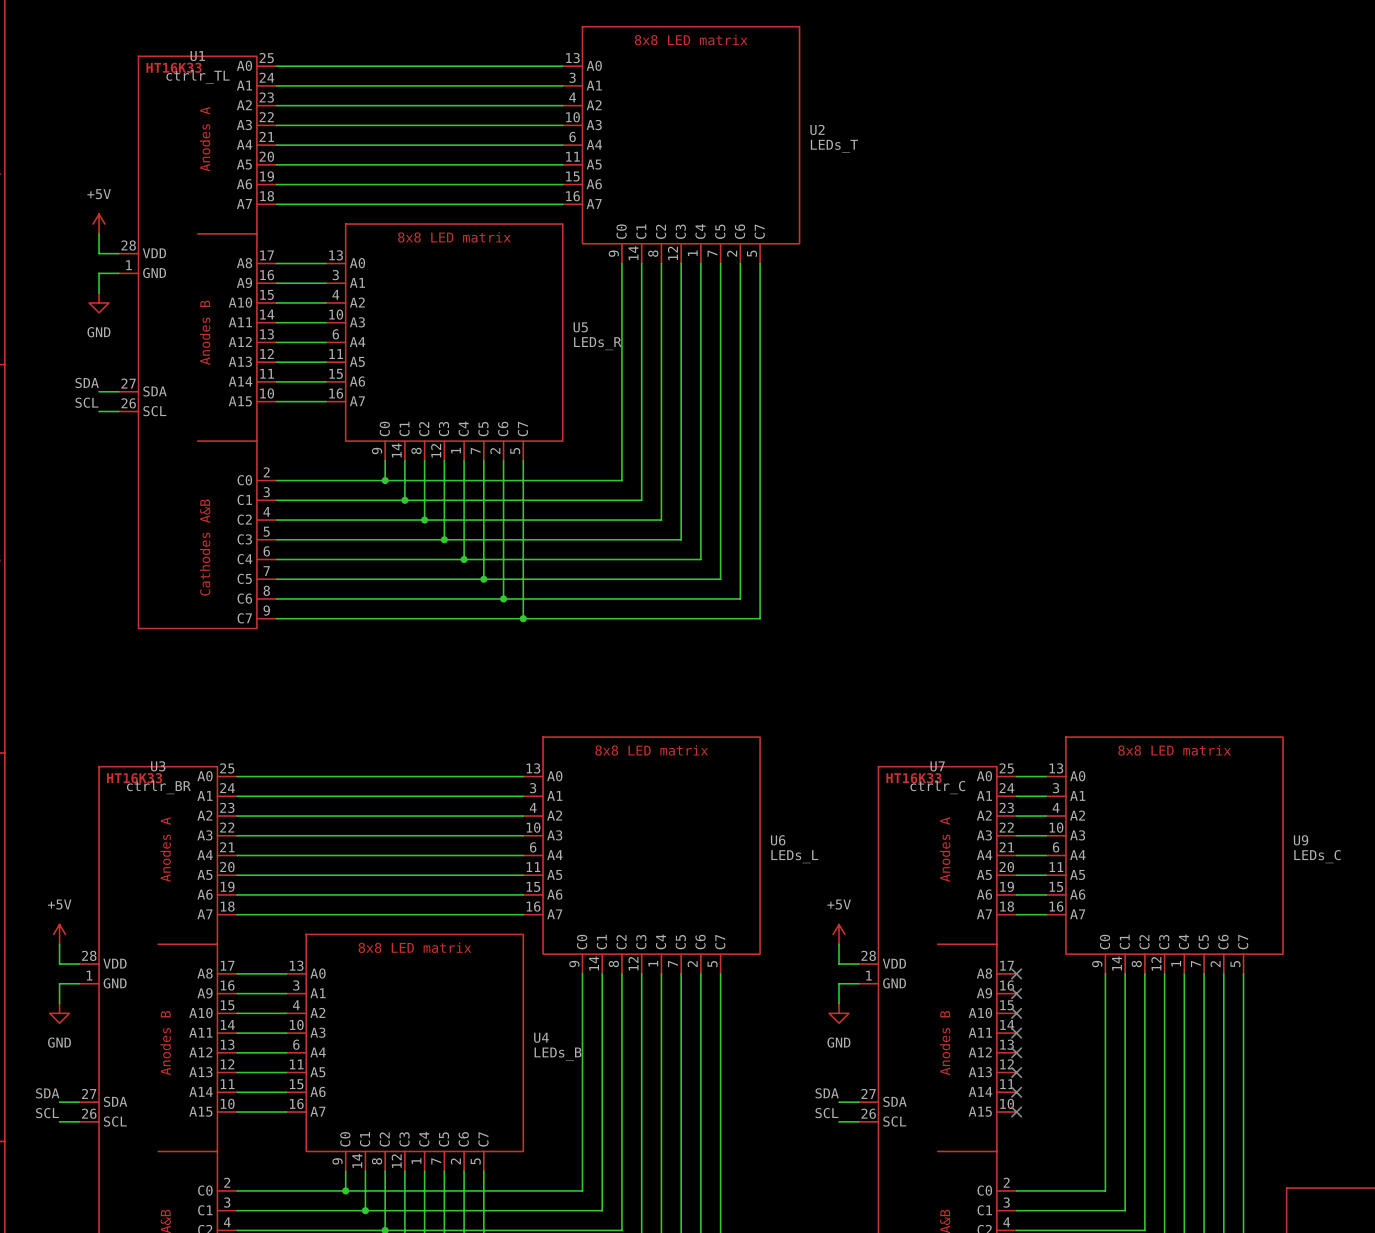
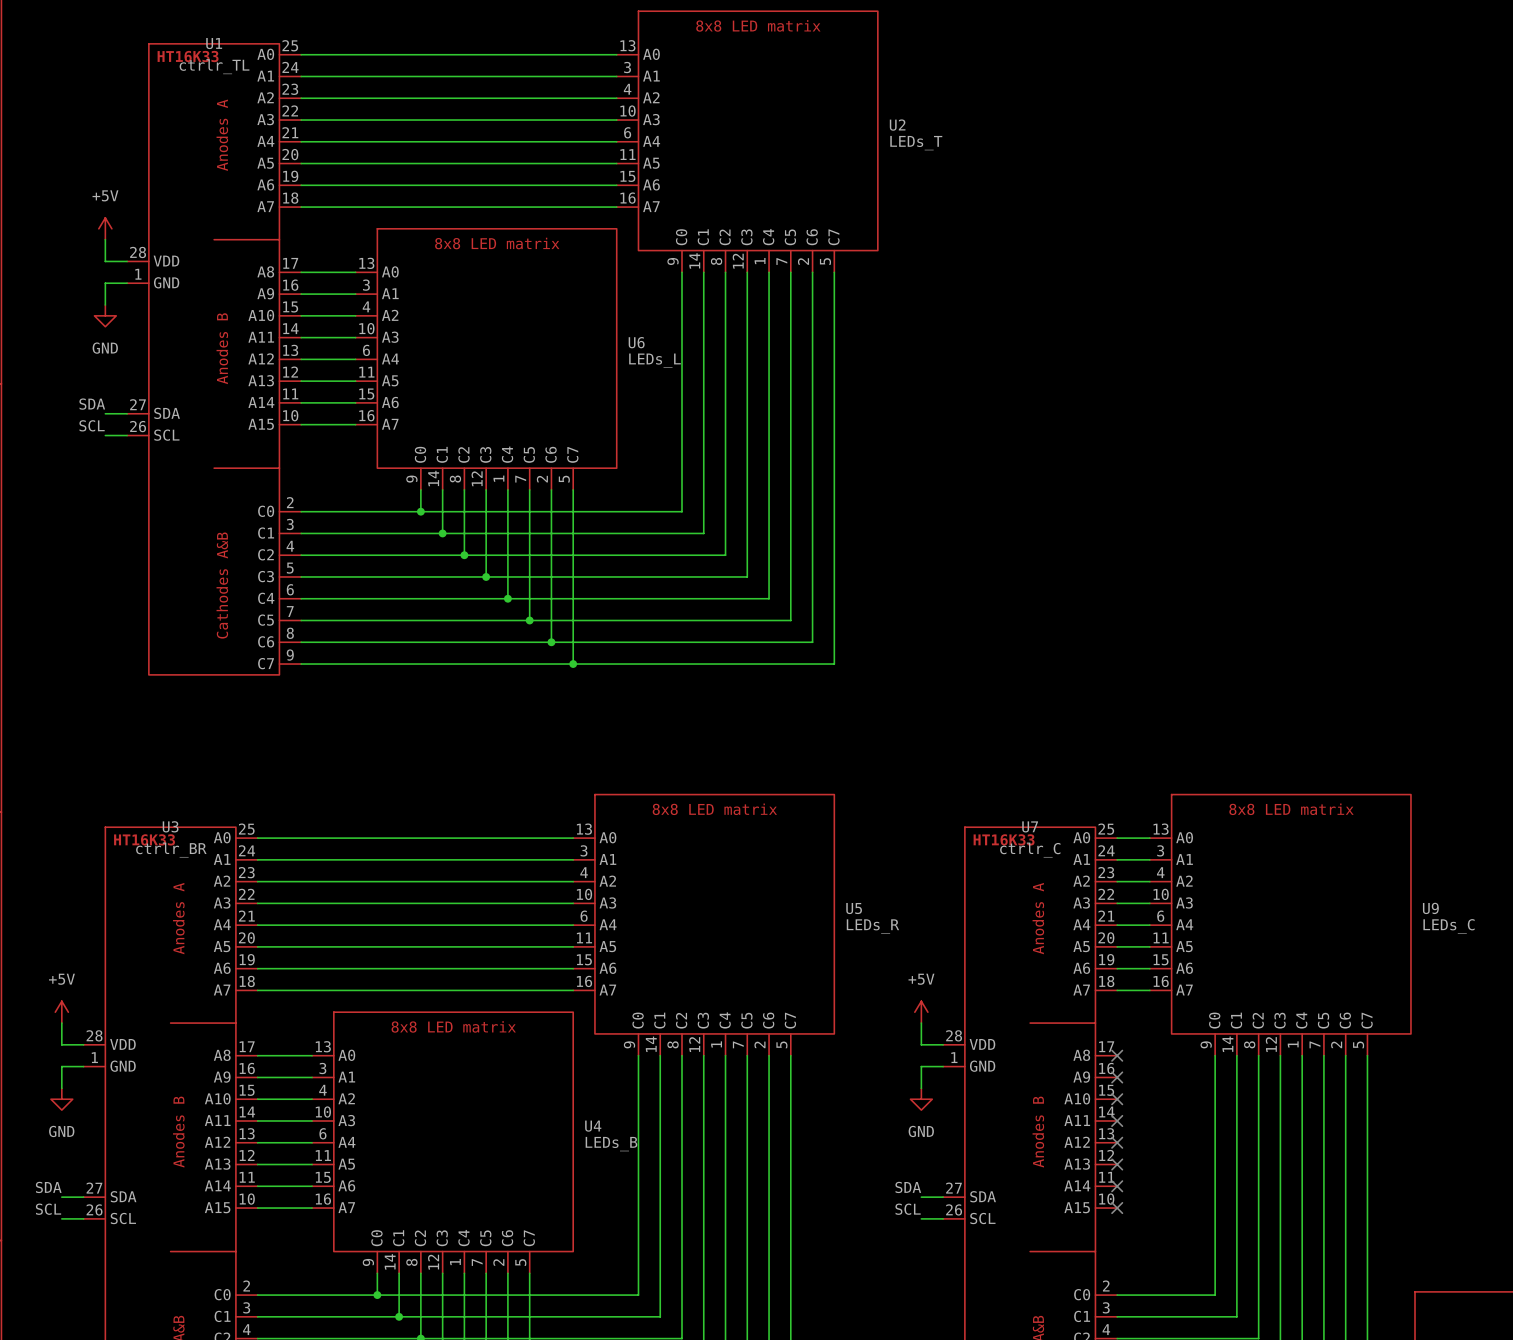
U5 name: U5 (580, 327) -> U6 (636, 342)
U5 value: LEDs_R (597, 343) -> LEDs_L (654, 360)
U6 name: U6 (778, 840) -> U5 (854, 908)
U6 value: LEDs_L (794, 856) -> LEDs_R (872, 926)

